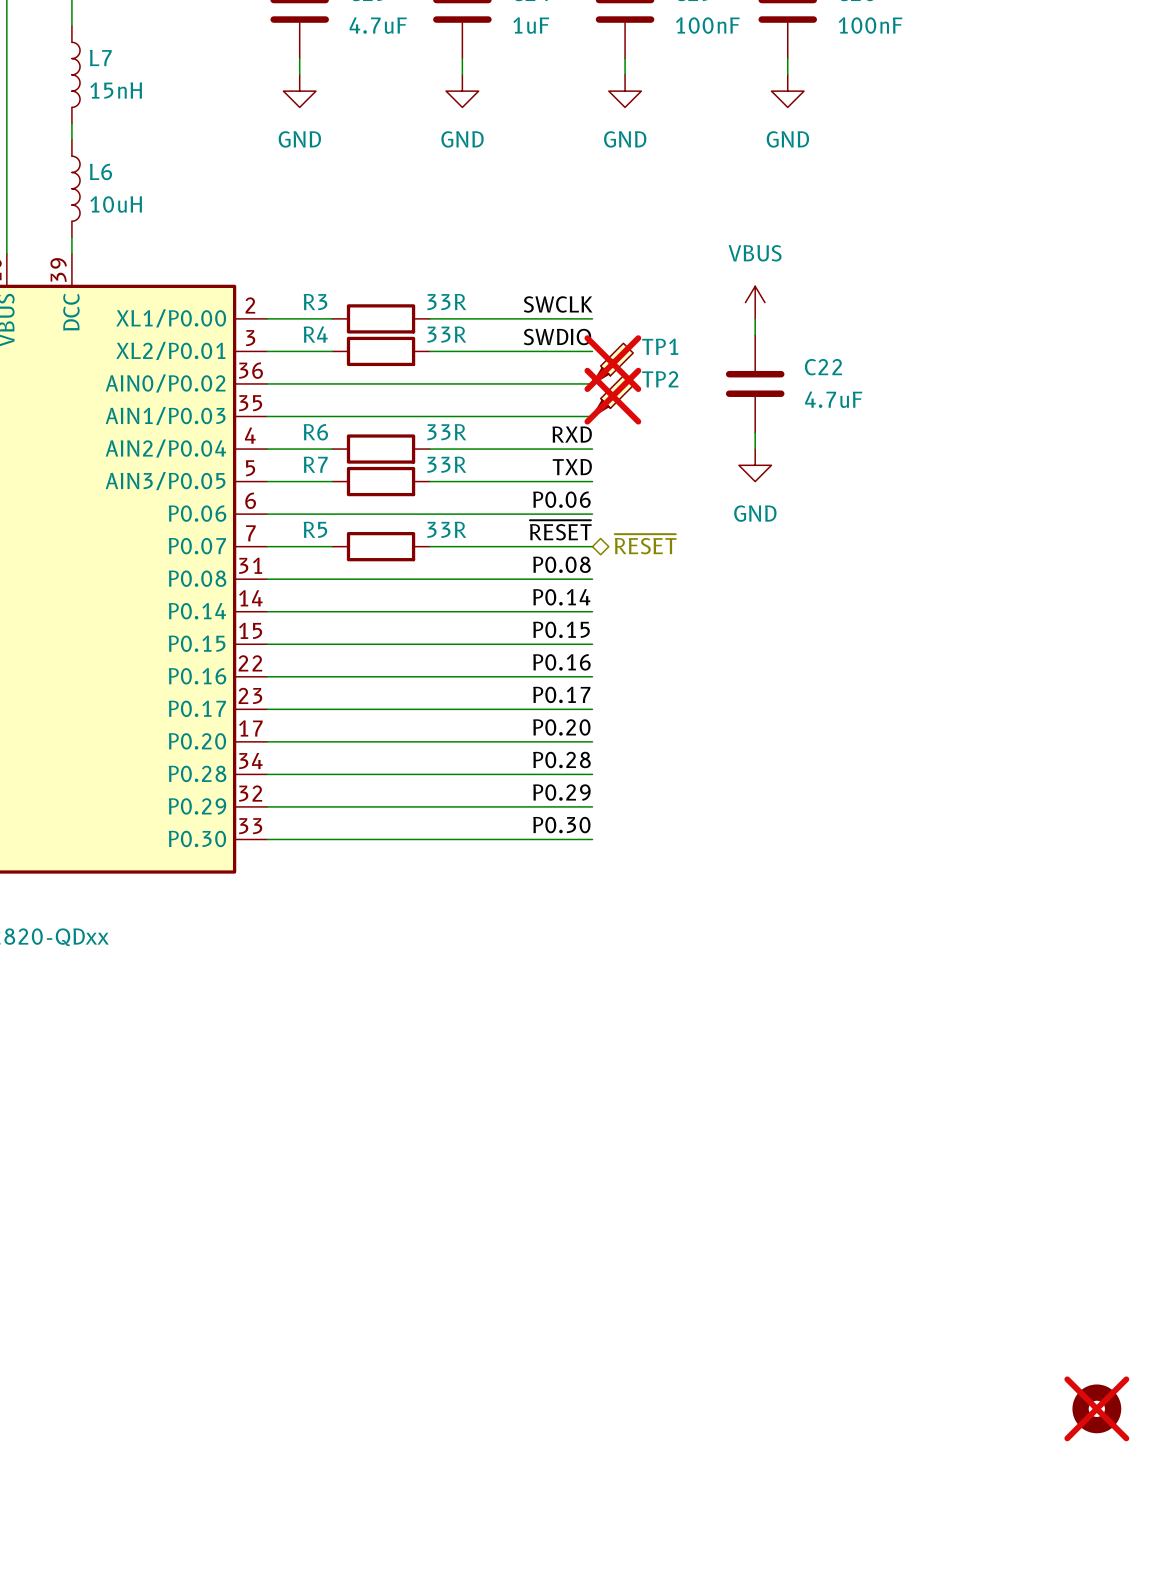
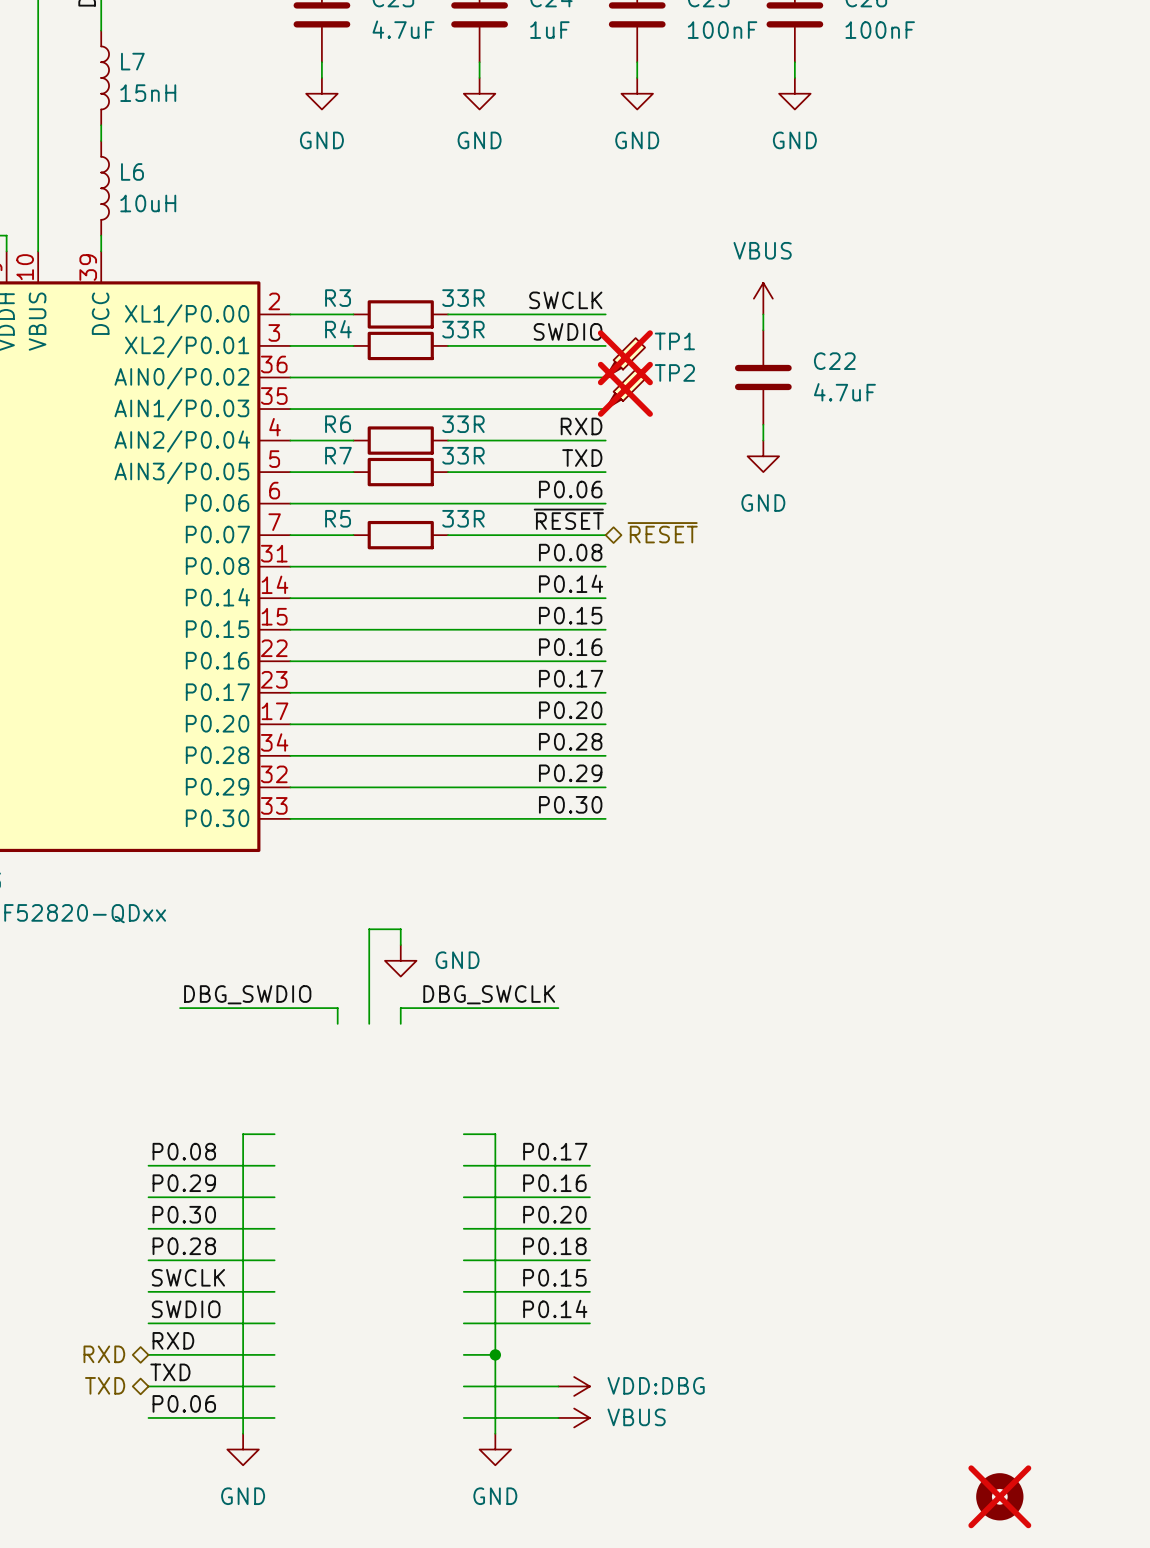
wire: none -> (400, 945) (400, 929) (369, 929) (369, 1023)
power symbol: none -> GND (400, 960)
label: none -> DBG_SWDIO (247, 994)
label: none -> DBG_SWCLK (489, 994)
wire: none -> (180, 1008) (337, 1008) (337, 1023)
wire: none -> (558, 1008) (400, 1008) (400, 1023)
wire: none -> (274, 1134) (243, 1134) (243, 1433)
wire: none -> (463, 1134) (495, 1134) (495, 1433)
label: none -> P0.08 (184, 1151)
label: none -> P0.17 (555, 1151)
wire: none -> (148, 1165) (274, 1165)
wire: none -> (463, 1165) (589, 1165)
label: none -> P0.29 (184, 1183)
label: none -> P0.16 (554, 1183)
wire: none -> (148, 1197) (274, 1197)
wire: none -> (463, 1197) (589, 1197)
label: none -> P0.30 (184, 1214)
label: none -> P0.20 (554, 1214)
wire: none -> (148, 1228) (274, 1228)
wire: none -> (463, 1228) (589, 1228)
label: none -> P0.28 (184, 1246)
label: none -> P0.18 (554, 1246)
wire: none -> (148, 1260) (274, 1260)
wire: none -> (463, 1260) (589, 1260)
label: none -> SWCLK (188, 1277)
label: none -> P0.15 (554, 1277)
wire: none -> (148, 1291) (274, 1291)
wire: none -> (463, 1291) (589, 1291)
label: none -> SWDIO (186, 1309)
label: none -> P0.14 (555, 1308)
wire: none -> (148, 1323) (274, 1323)
wire: none -> (463, 1323) (589, 1323)
label: none -> RXD (173, 1340)
hierarchical label: none -> RXD (104, 1354)
wire: none -> (148, 1354) (274, 1354)
wire: none -> (463, 1354) (495, 1354)
junction: none -> (495, 1354)
part position: (1096, 1408) -> (999, 1496)
label: none -> TXD (170, 1372)
hierarchical label: none -> TXD (105, 1385)
wire: none -> (148, 1386) (274, 1386)
wire: none -> (463, 1386) (558, 1386)
power symbol: none -> VDD:DBG (574, 1386)
label: none -> P0.06 (184, 1403)
wire: none -> (148, 1417) (274, 1417)
wire: none -> (463, 1417) (558, 1417)
power symbol: none -> VBUS (574, 1417)
power symbol: none -> GND (243, 1449)
power symbol: none -> GND (495, 1449)

